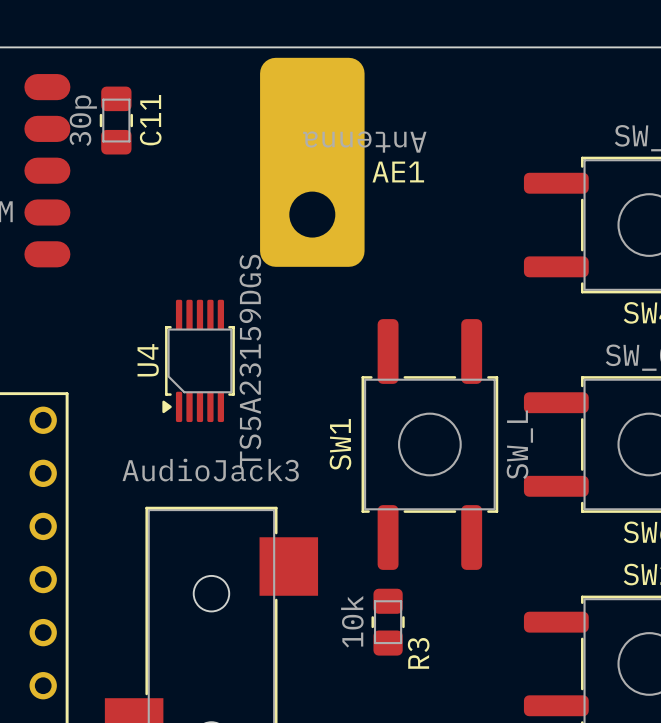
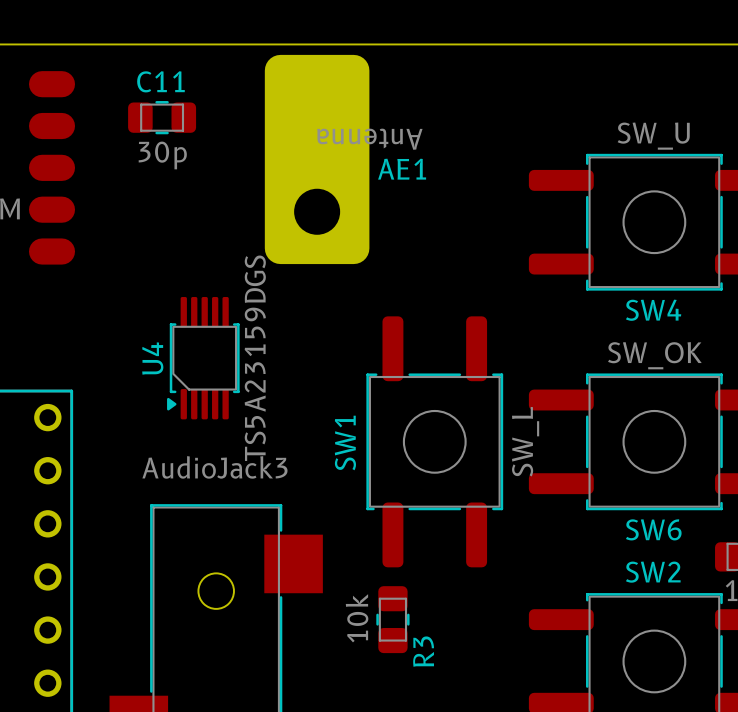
C11 value position: 30p (83, 120) -> 30p (162, 155)
C11 rotation: 0° (116, 120) -> 90° clockwise (162, 117)
C11 position: (116, 120) -> (162, 117)
C11 name position: C11 (150, 120) -> C11 (160, 81)

